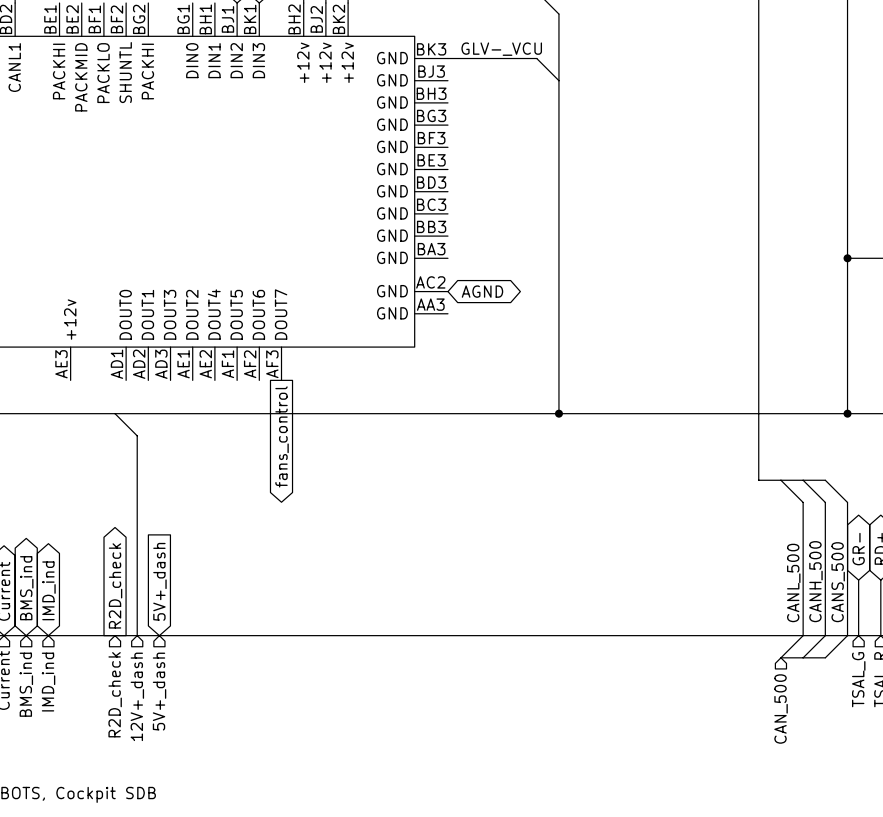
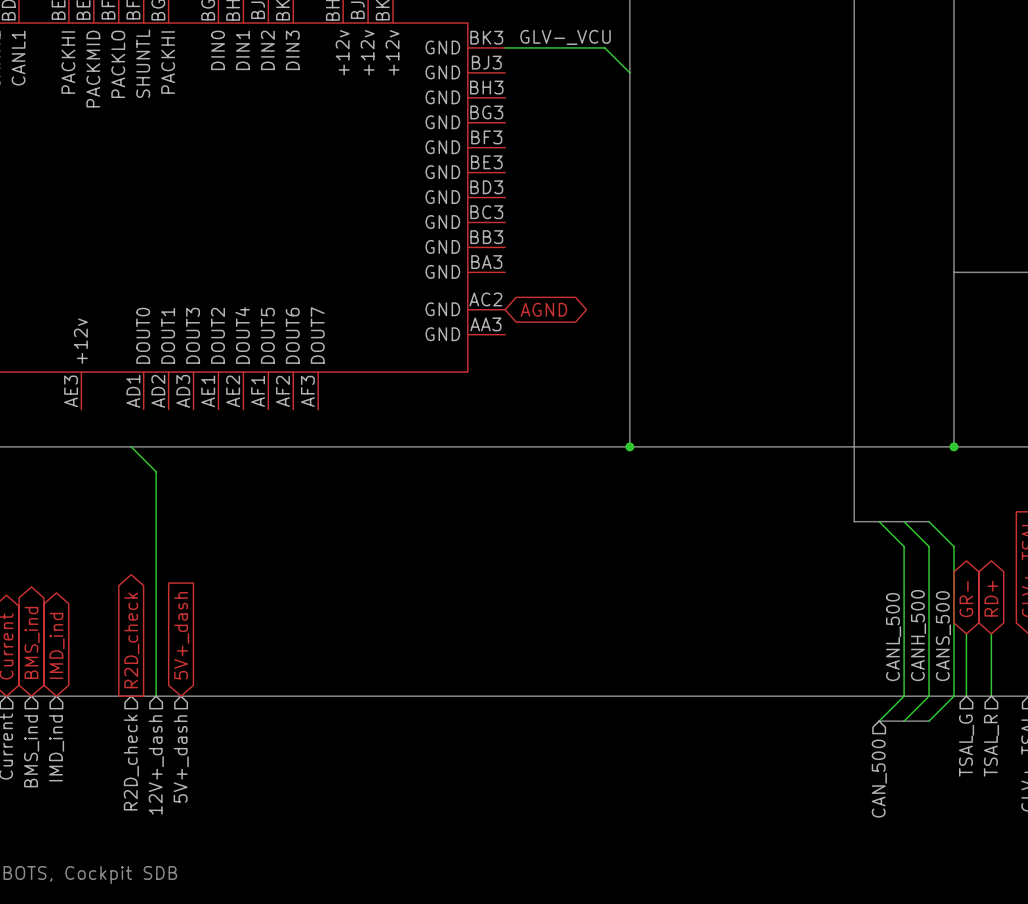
junction: (847, 258) -> none
global label: fans_control (282, 436) -> none

